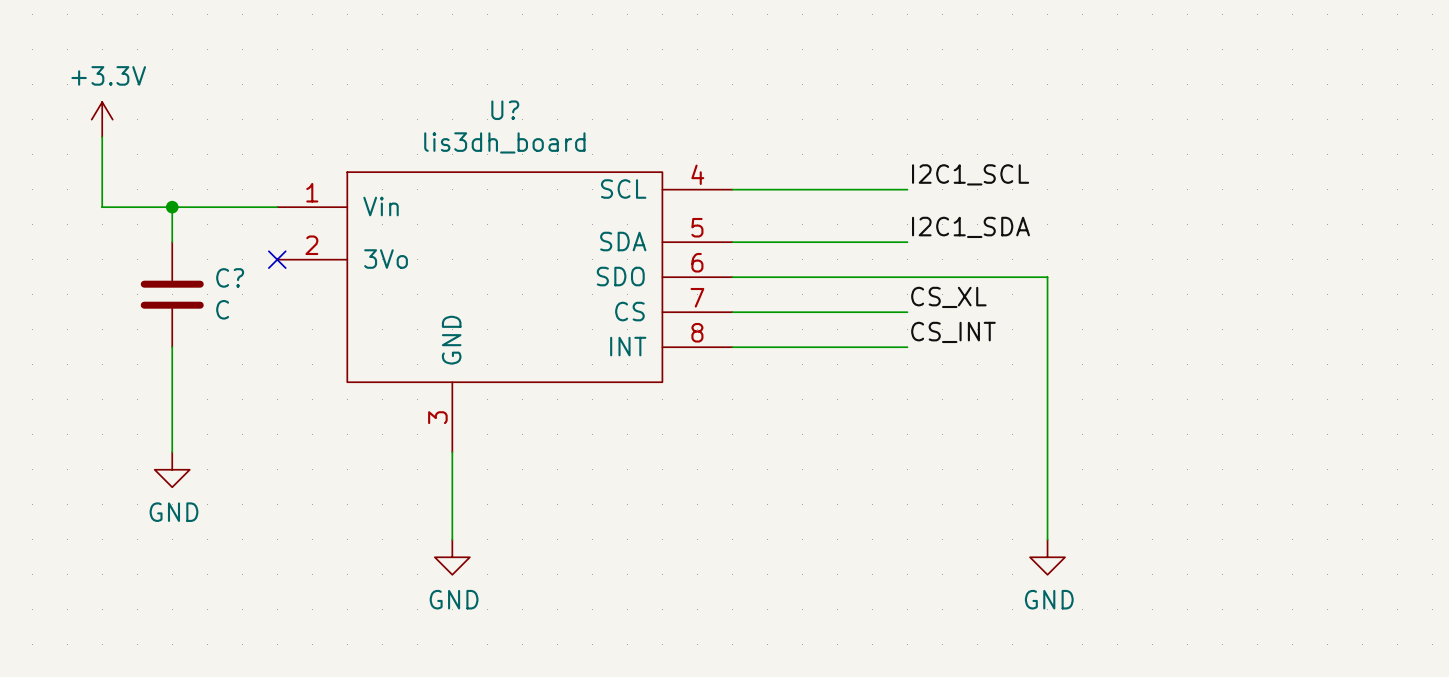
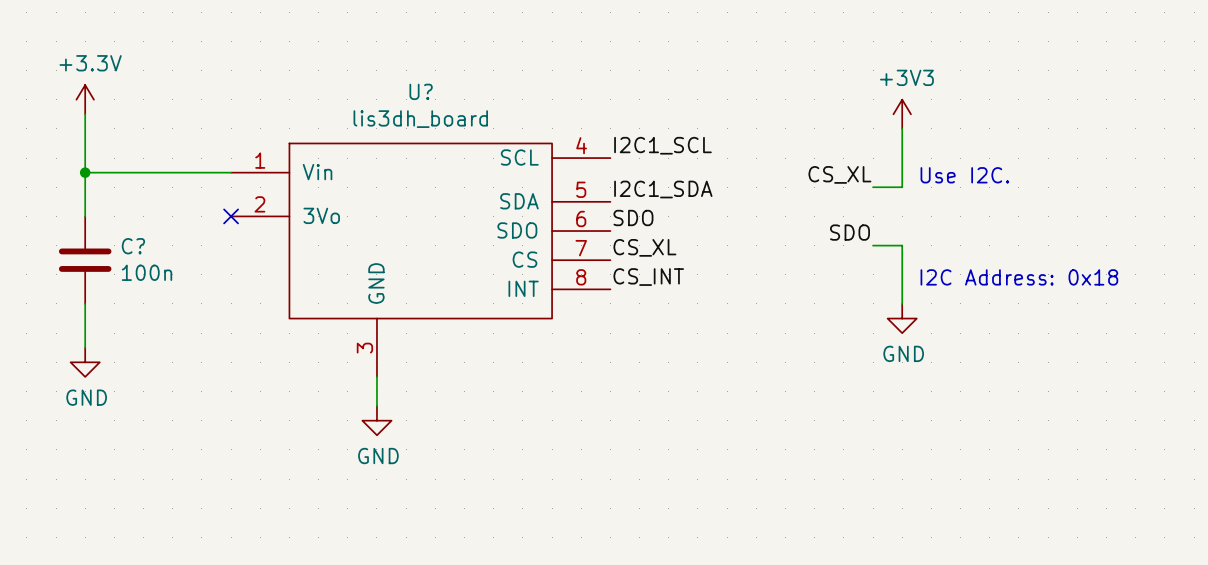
power symbol: none -> +3V3 (902, 114)
wire: none -> (902, 128) (902, 187) (873, 187)
label position: I2C1_SCL (970, 174) -> I2C1_SCL (662, 145)
wire: (732, 189) (907, 189) -> none
wire: none -> (85, 172) (85, 216)
wire: (172, 207) (172, 242) -> none
junction position: (172, 207) -> (85, 172)
label: none -> CS_XL (839, 174)
text: none -> Use I2C. (964, 175)
label position: I2C1_SDA (970, 227) -> I2C1_SDA (663, 189)
wire: (732, 242) (907, 242) -> none
label: none -> SDO (633, 217)
wire: (732, 277) (1047, 277) (1047, 539) -> none
label: none -> SDO (849, 232)
C?: C (172, 294) -> none
wire: none -> (873, 245) (902, 245) (902, 303)
label: none -> CS_XL (644, 247)
label: CS_XL (948, 297) -> none
C?: none -> 100n (85, 260)
wire: (732, 312) (907, 312) -> none
label position: CS_INT (953, 332) -> CS_INT (648, 277)
text: none -> I2C Address: 0x18 (1019, 277)
wire: (172, 347) (172, 452) -> none
wire: (732, 347) (907, 347) -> none
wire: none -> (85, 303) (85, 347)
power symbol position: GND (172, 469) -> GND (85, 362)
wire: (452, 487) (452, 539) -> none
power symbol position: GND (452, 557) -> GND (376, 420)
power symbol position: GND (1047, 557) -> GND (902, 318)

